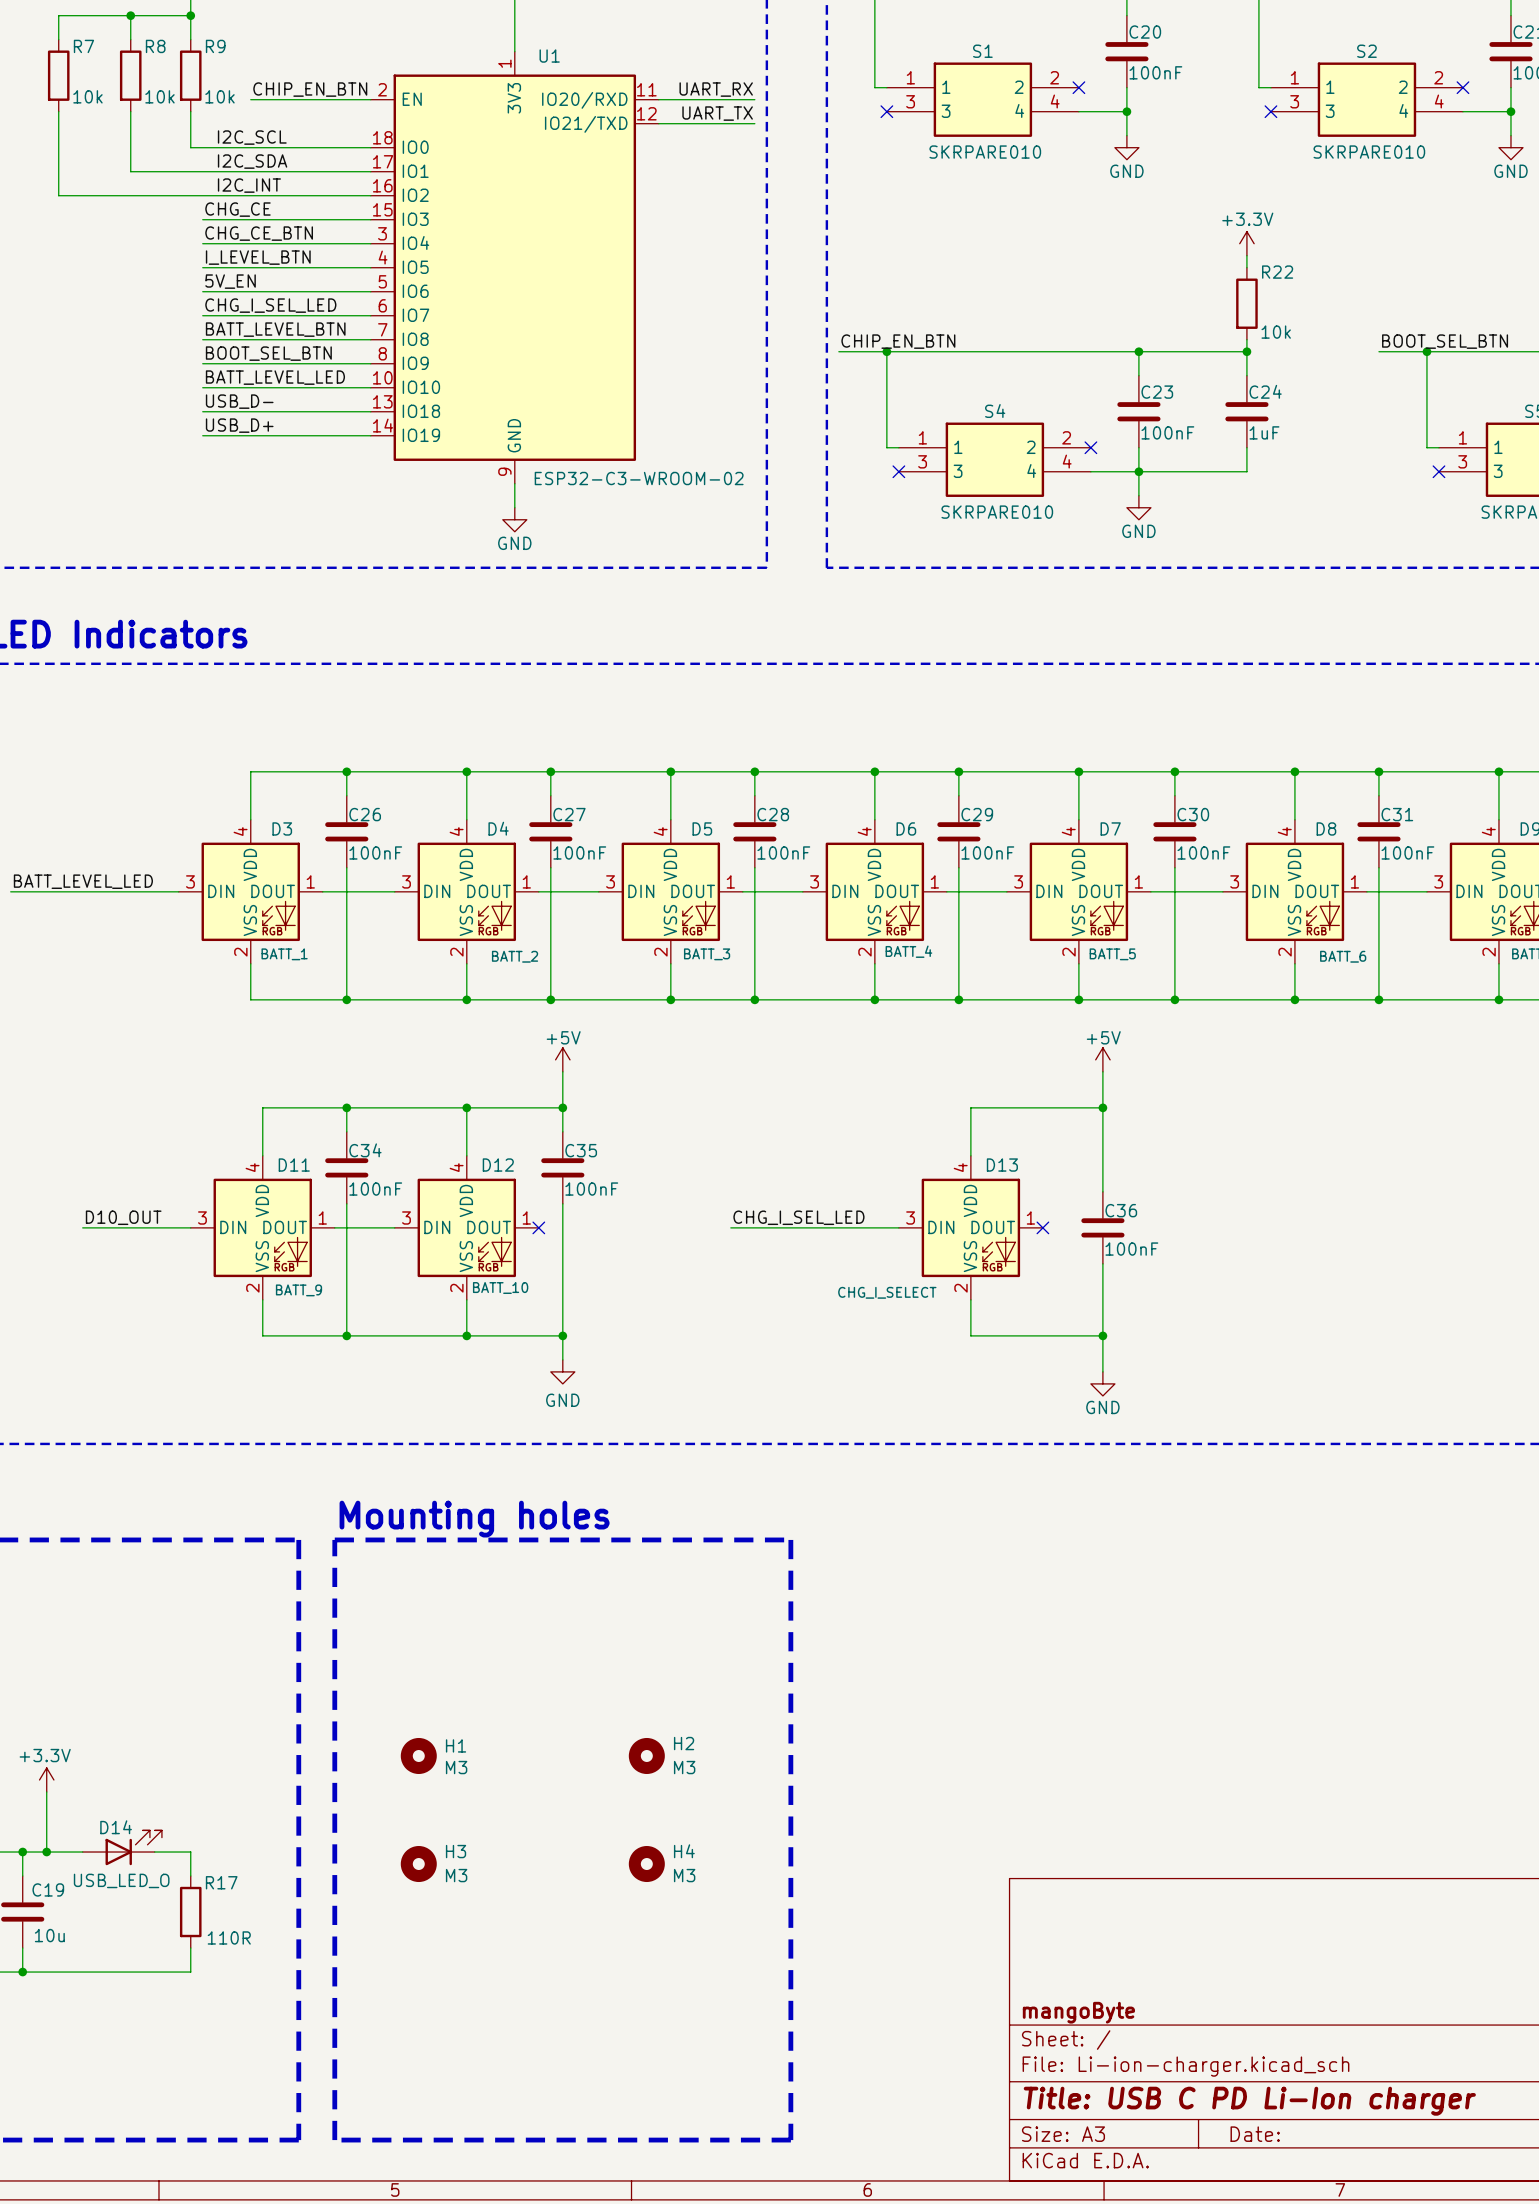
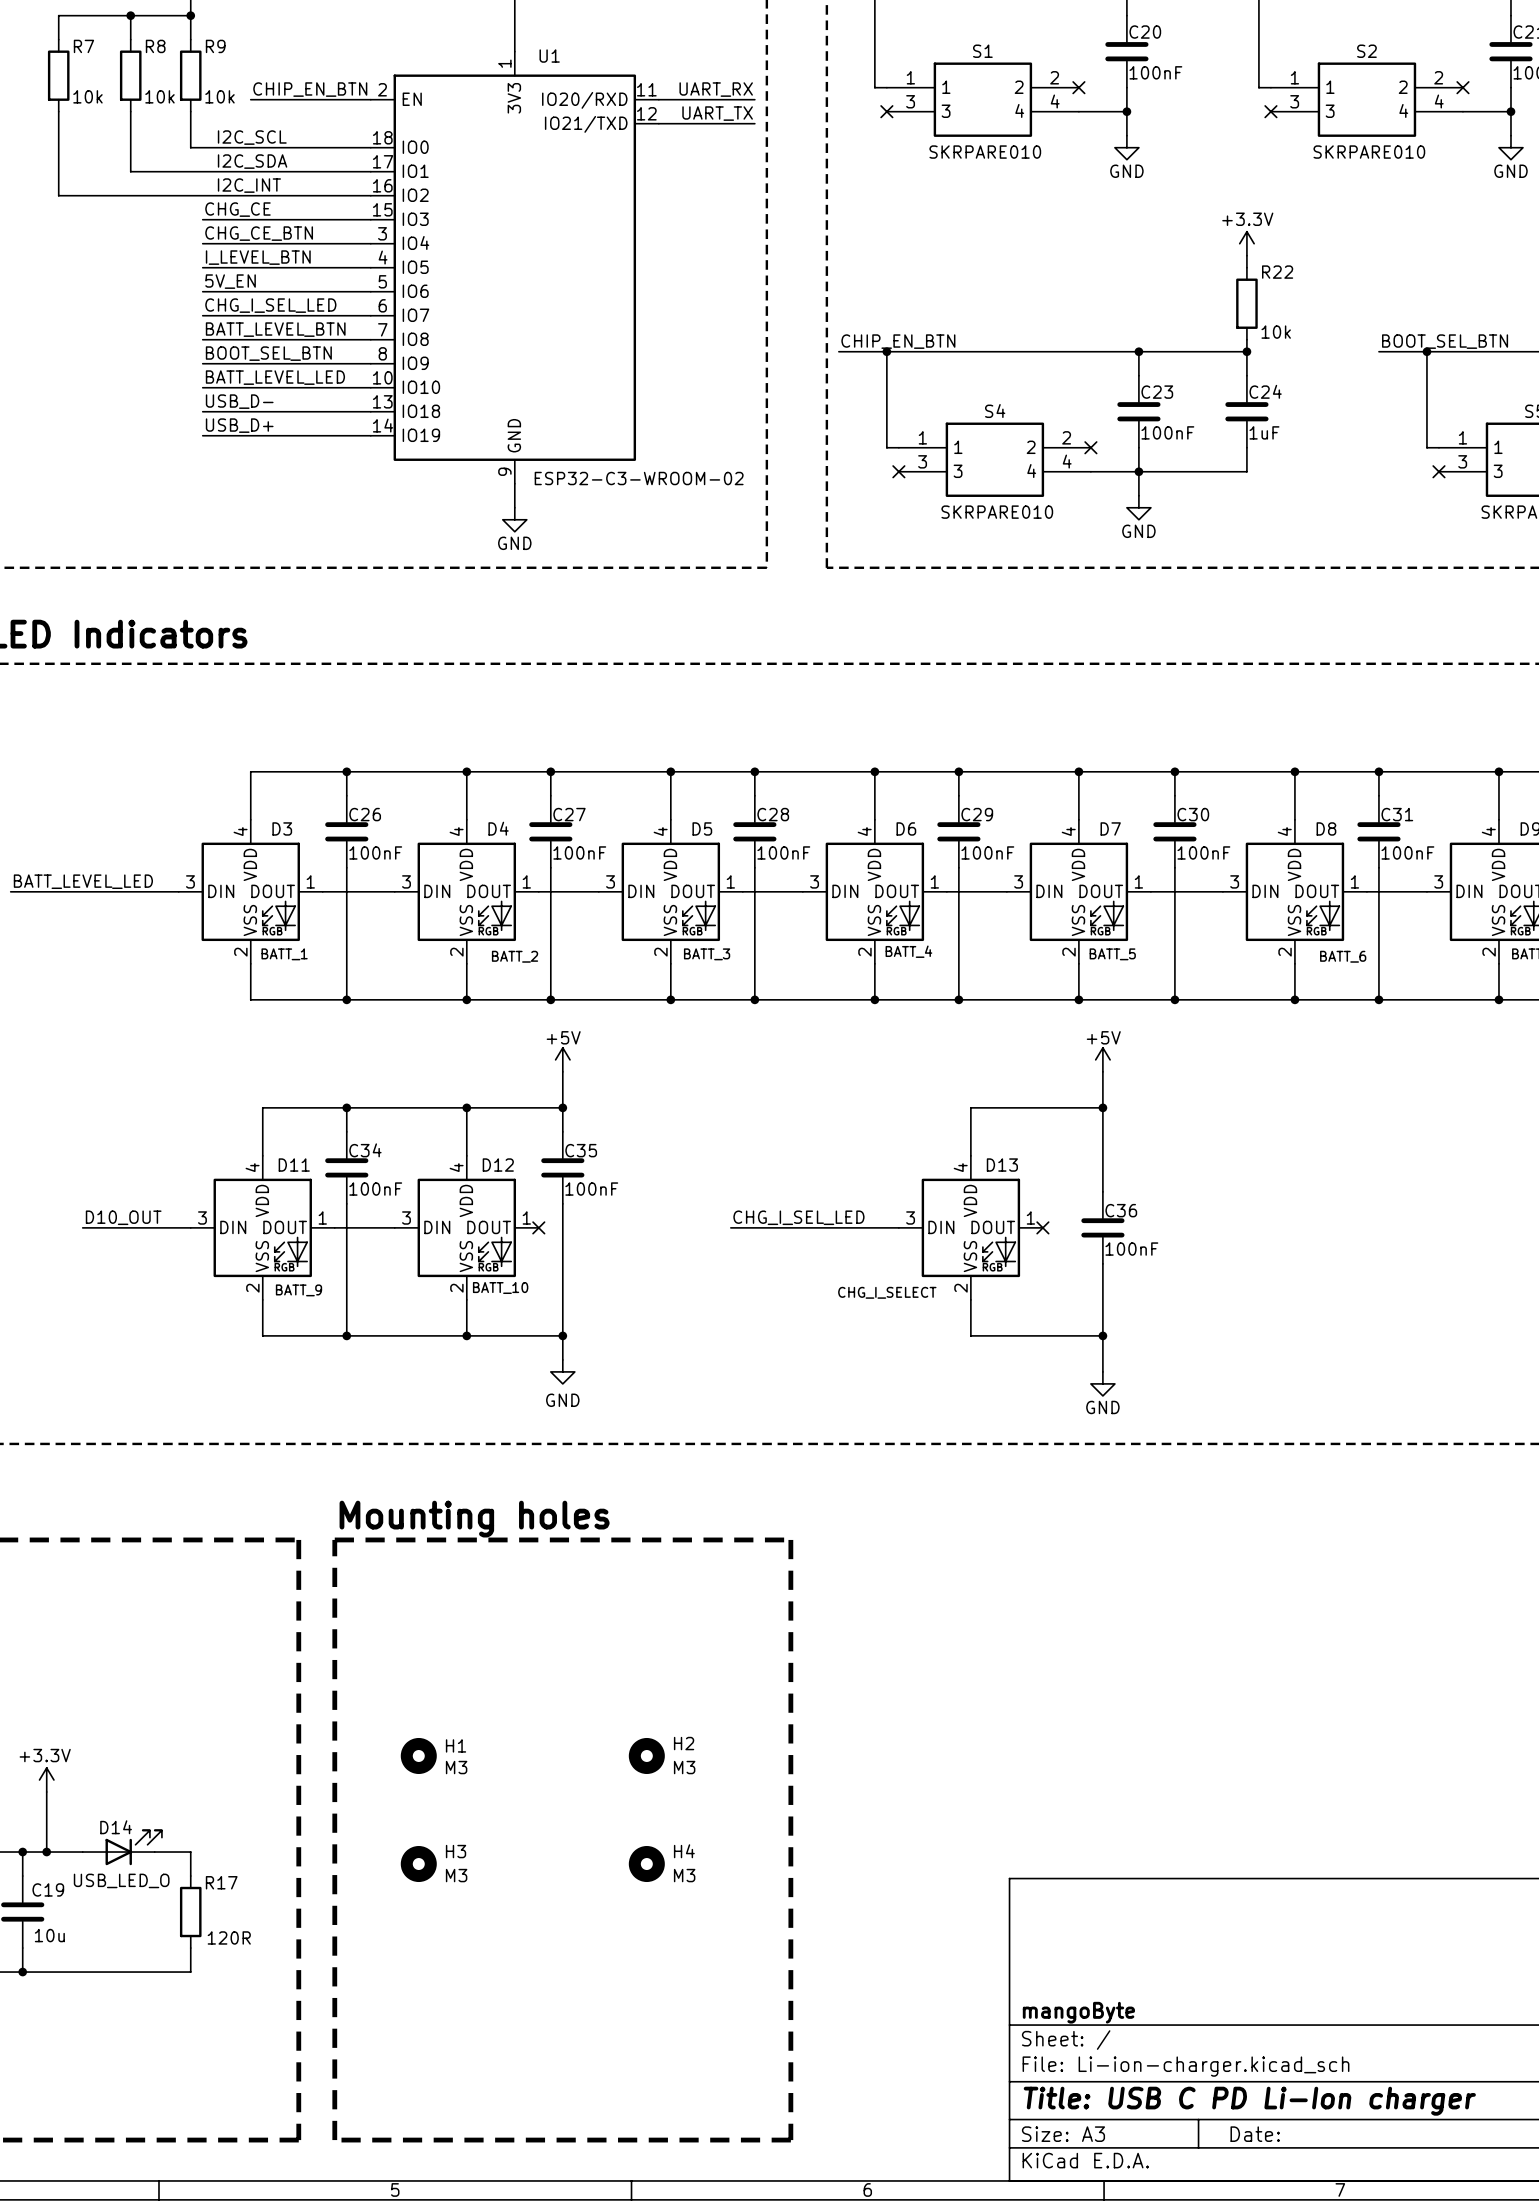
R17 value: 110R (229, 1937) -> 120R (229, 1937)

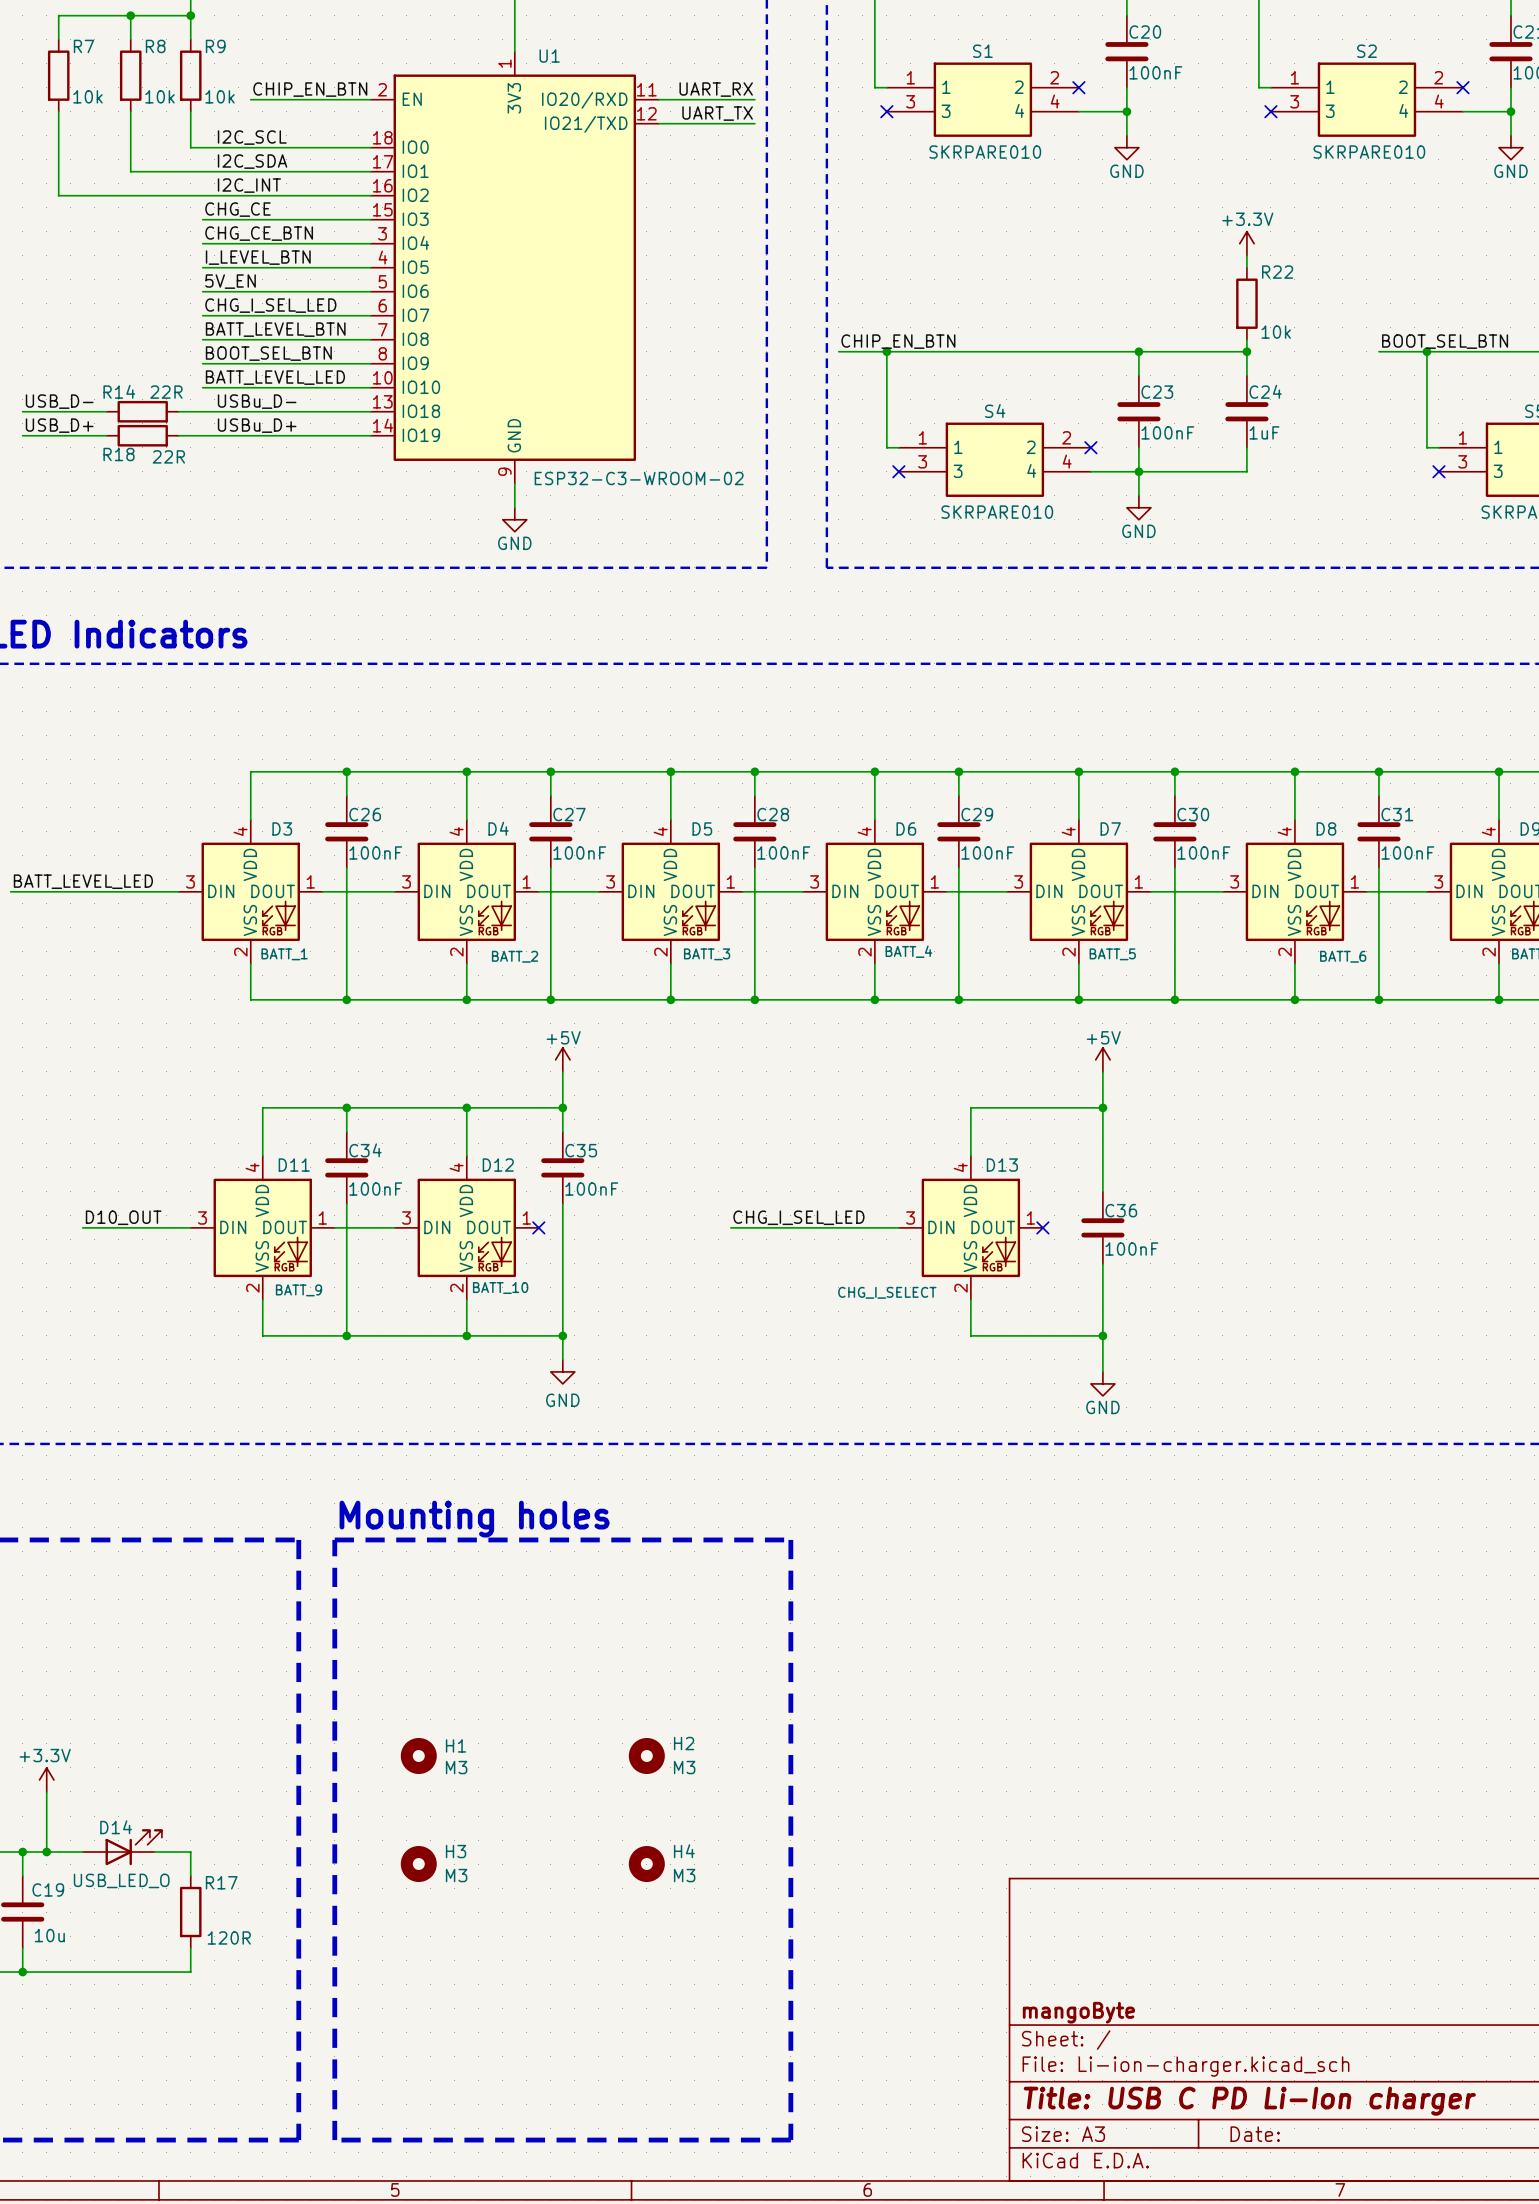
label position: USB_D- (239, 401) -> USB_D- (59, 401)
label: none -> USBu_D- (257, 401)
wire: none -> (22, 411) (106, 411)
R14: none -> 22R (142, 411)
wire: none -> (178, 411) (202, 411)
label position: USB_D+ (239, 425) -> USB_D+ (59, 425)
label: none -> USBu_D+ (257, 425)
wire: none -> (22, 435) (106, 435)
R18: none -> 22R (142, 435)
wire: none -> (178, 435) (202, 435)

